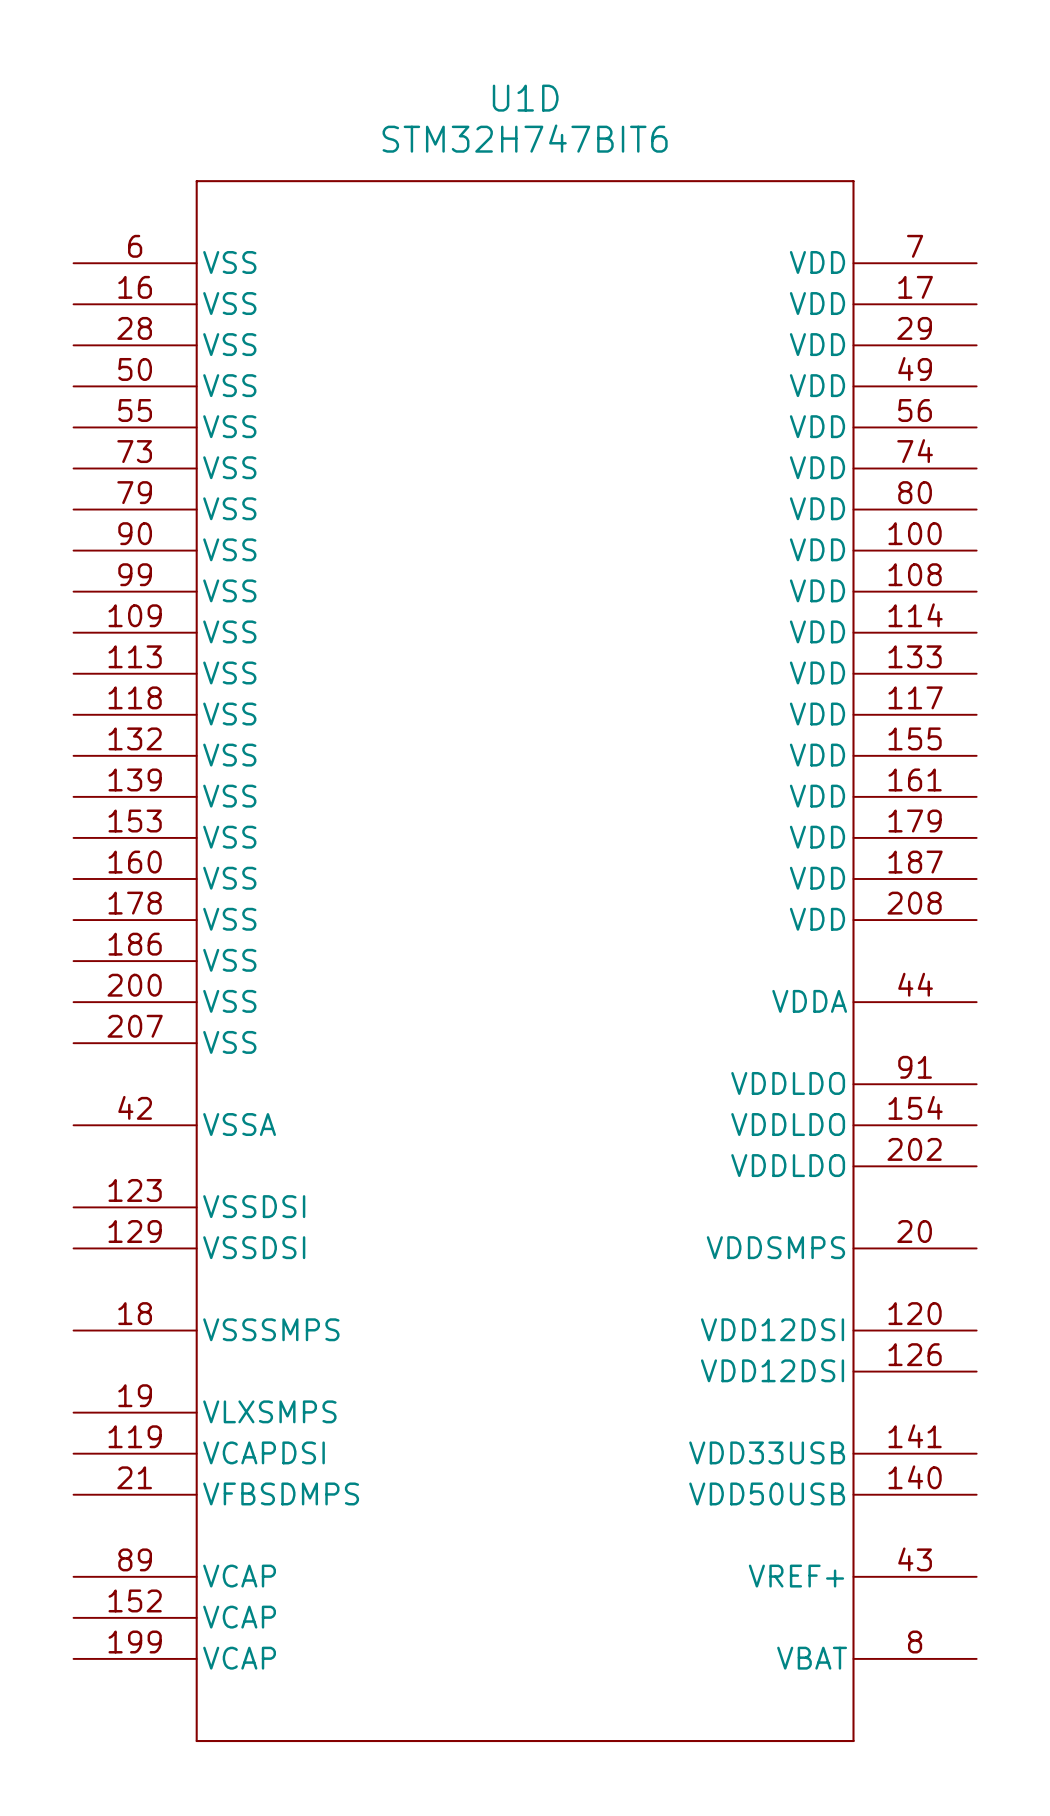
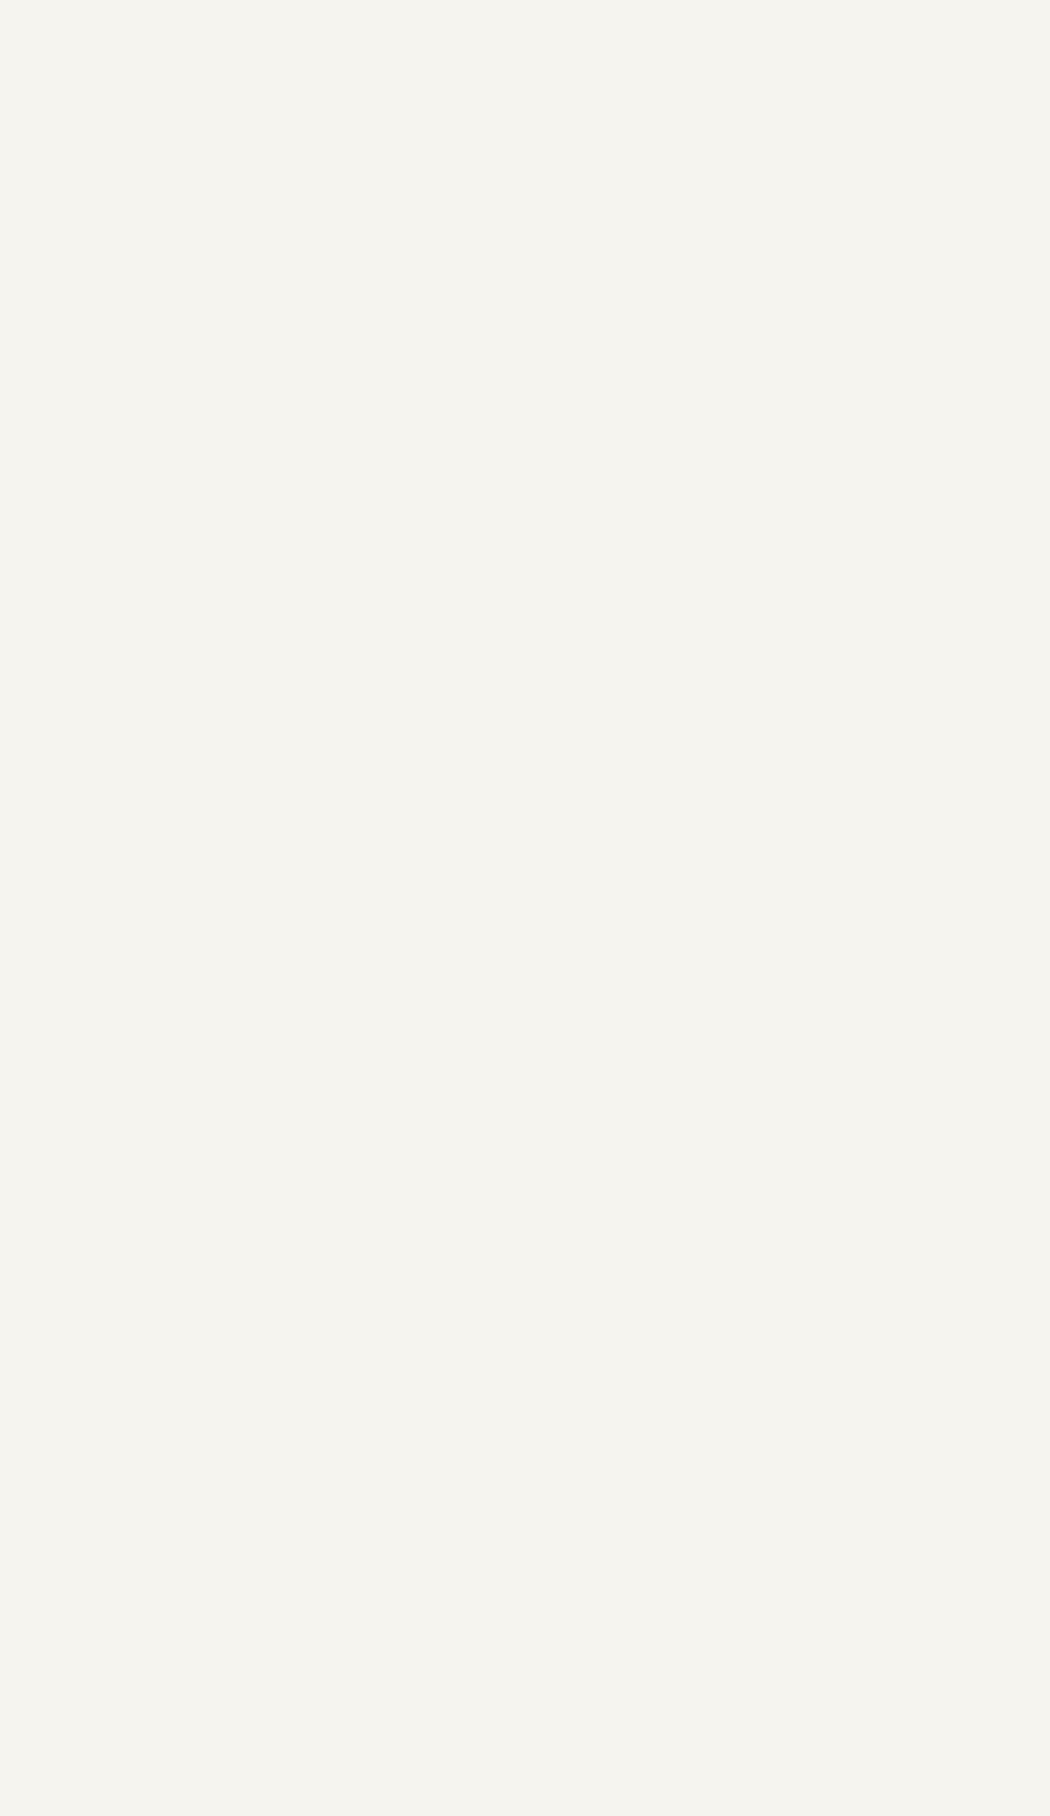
U1D: STM32H747BIT6 (525, 961) -> none

